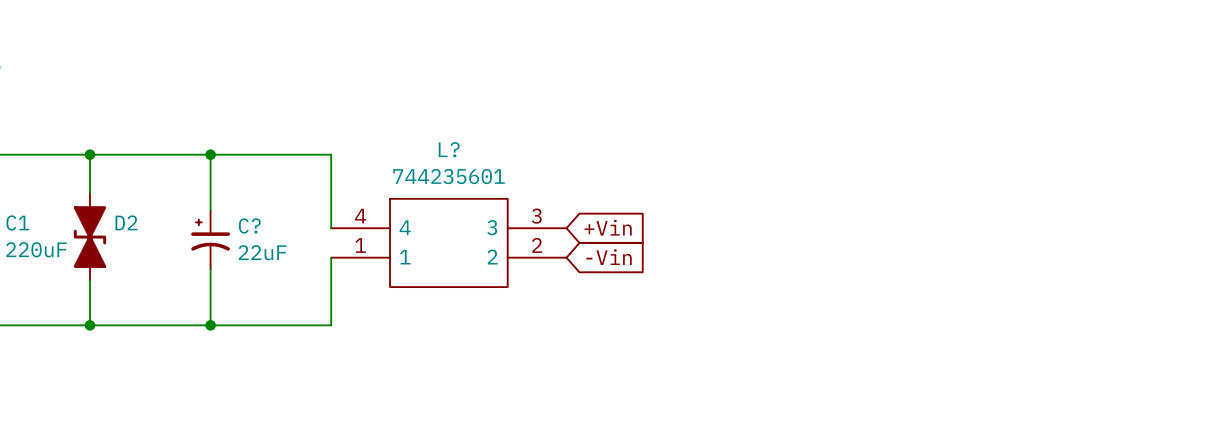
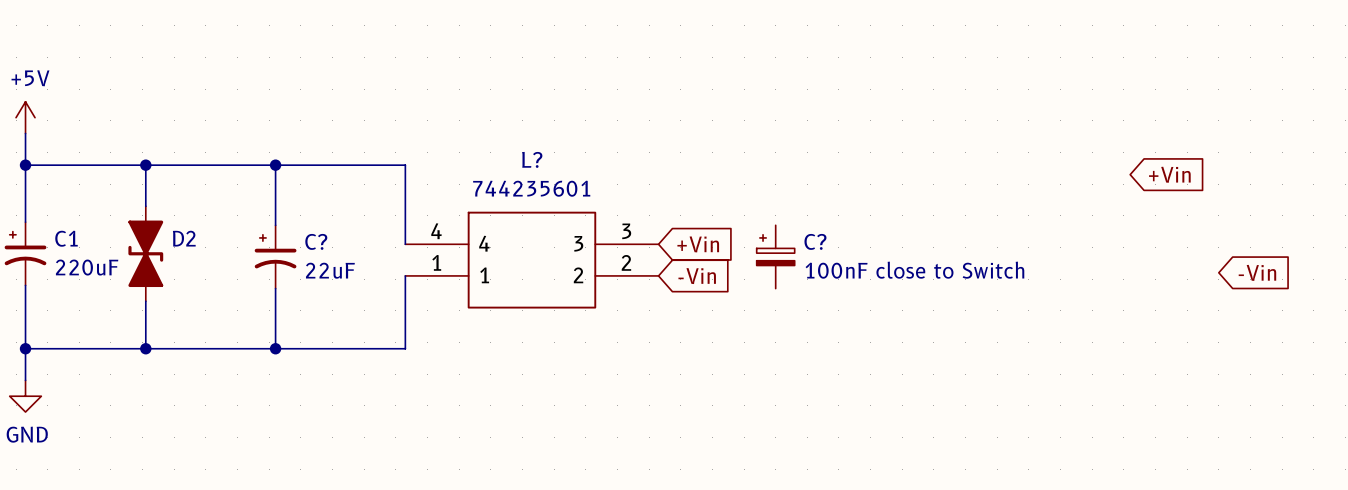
global label: none -> +Vin (1169, 174)
C?: none -> 100nF close to Switch (775, 256)
global label: none -> -Vin (1257, 272)

